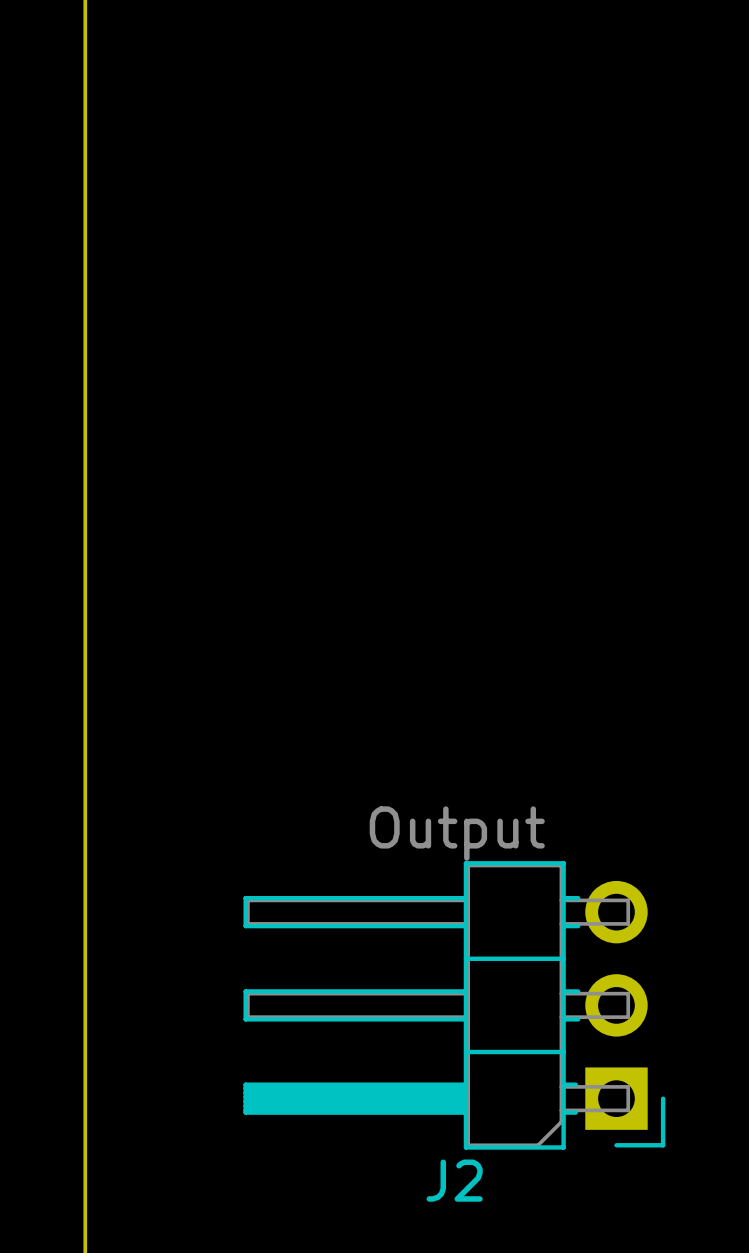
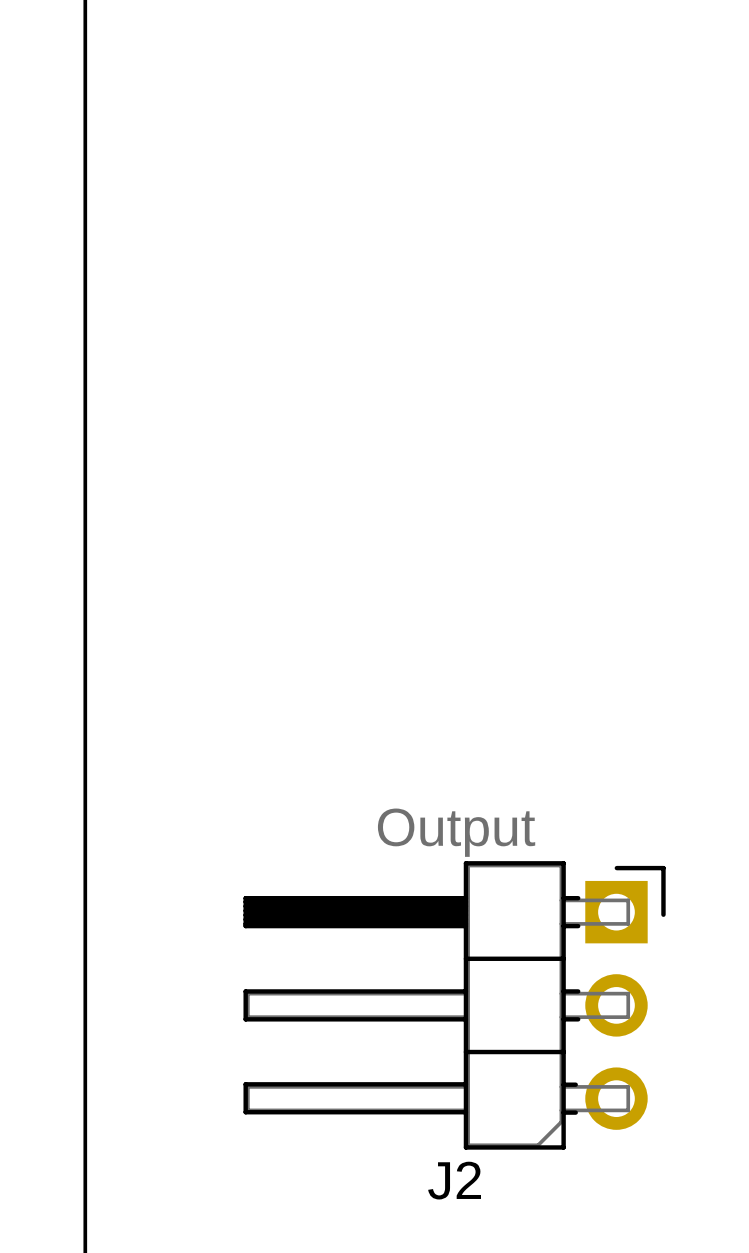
J2 footprint: [243, 861, 666, 1150] -> [243, 861, 666, 1150]

